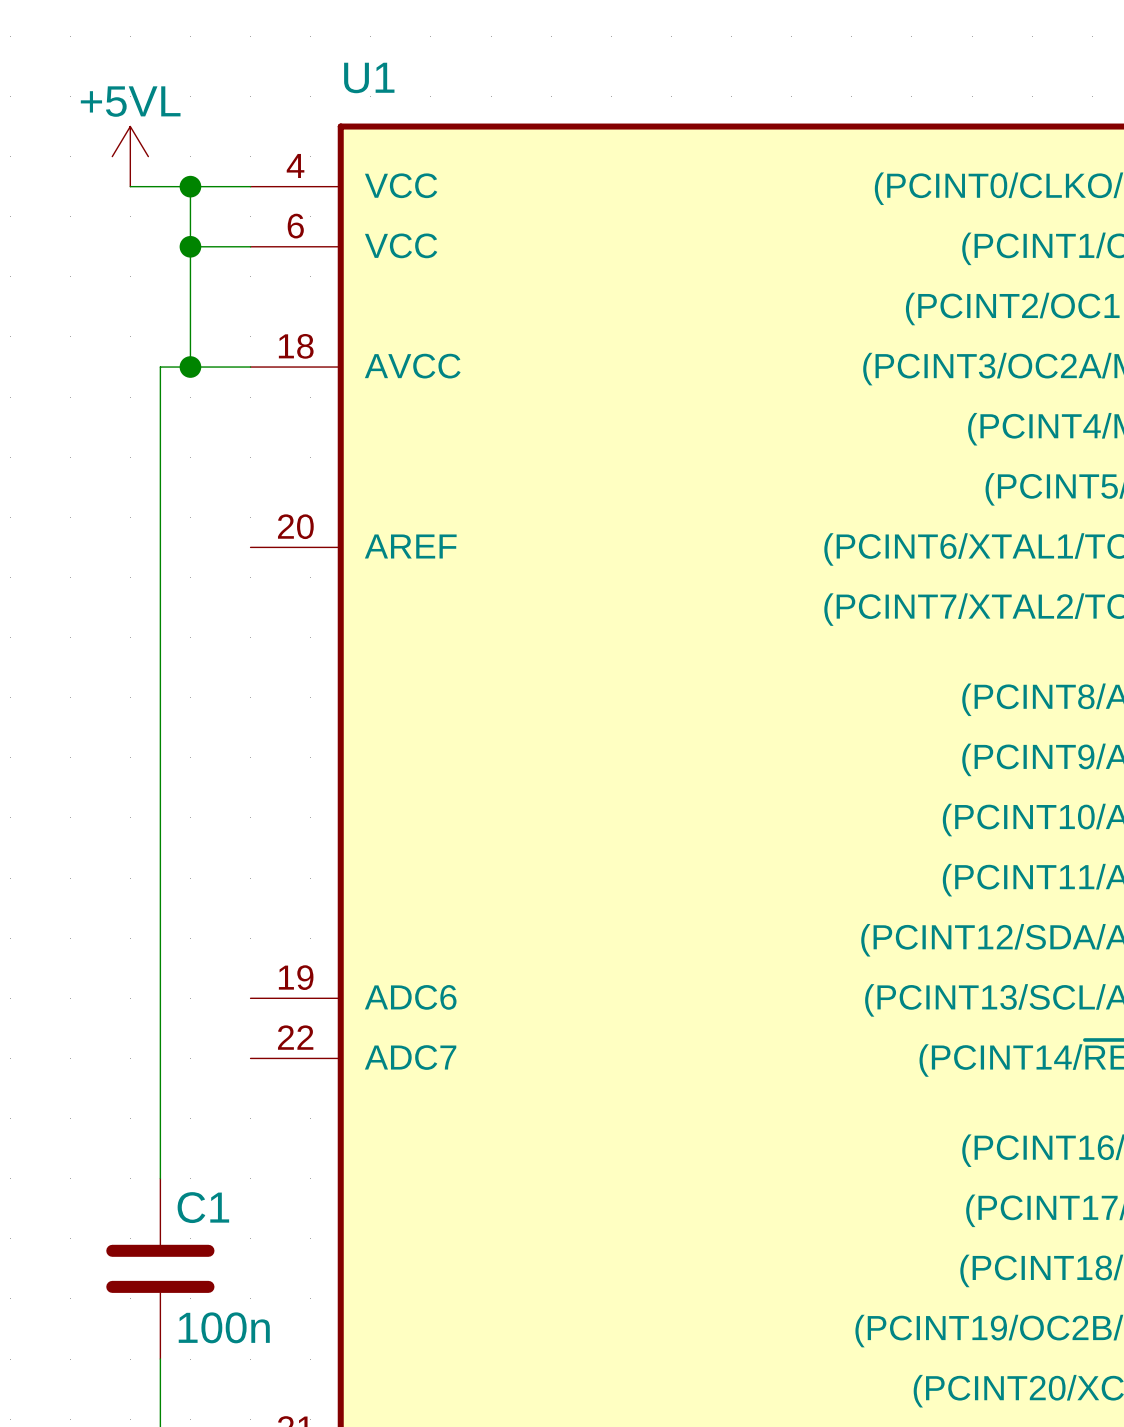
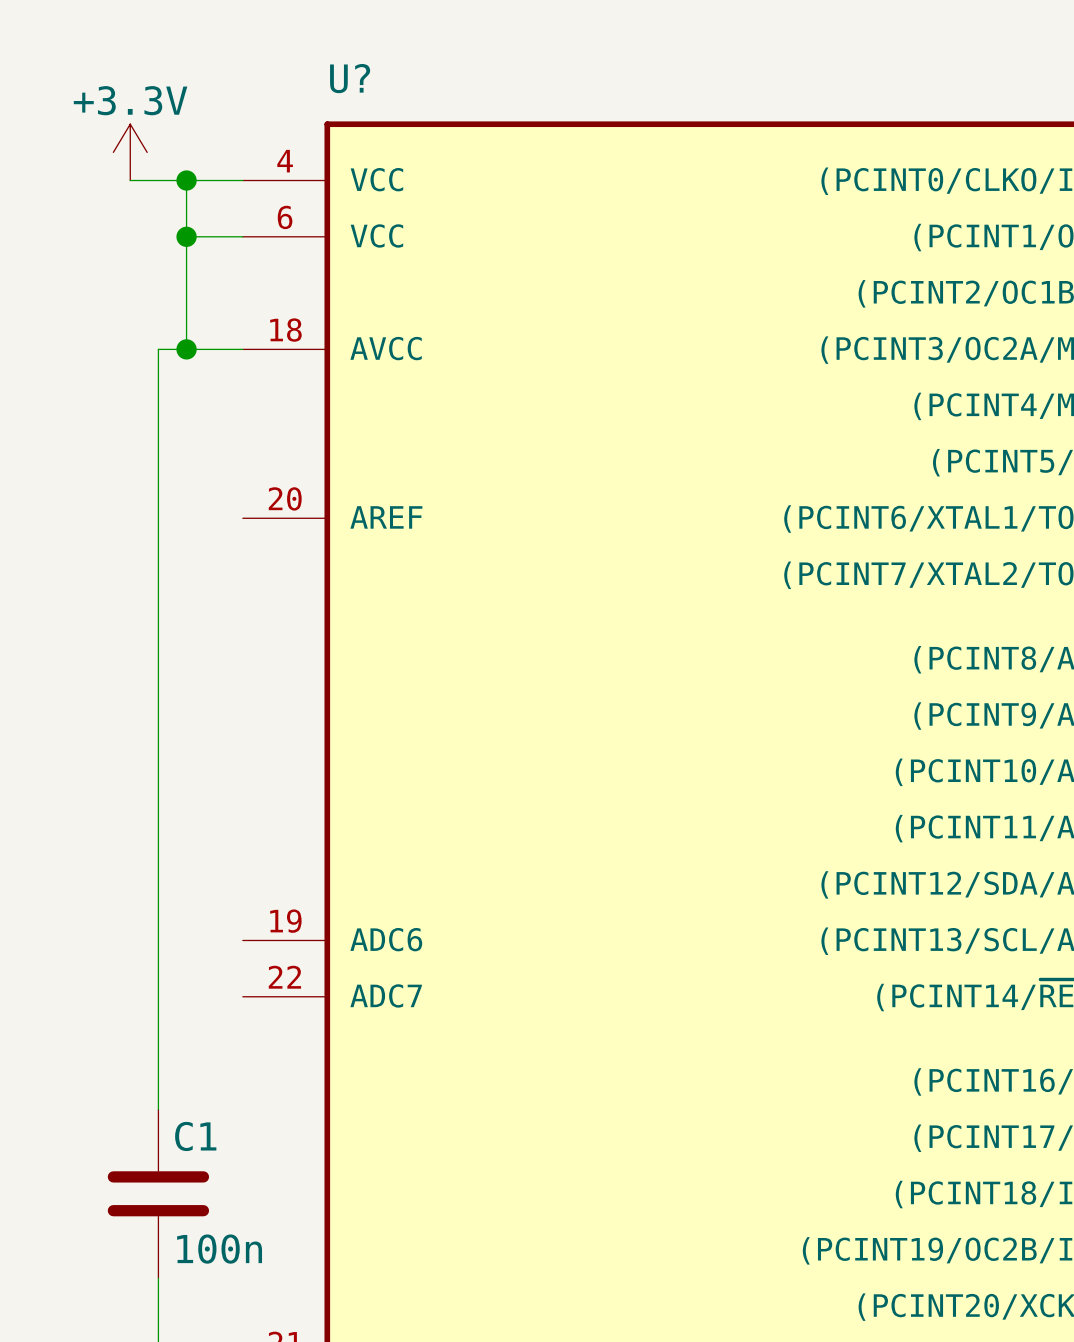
U1 name: U1 (369, 77) -> U? (350, 78)
power symbol: +5VL (130, 156) -> +3.3V (130, 152)

